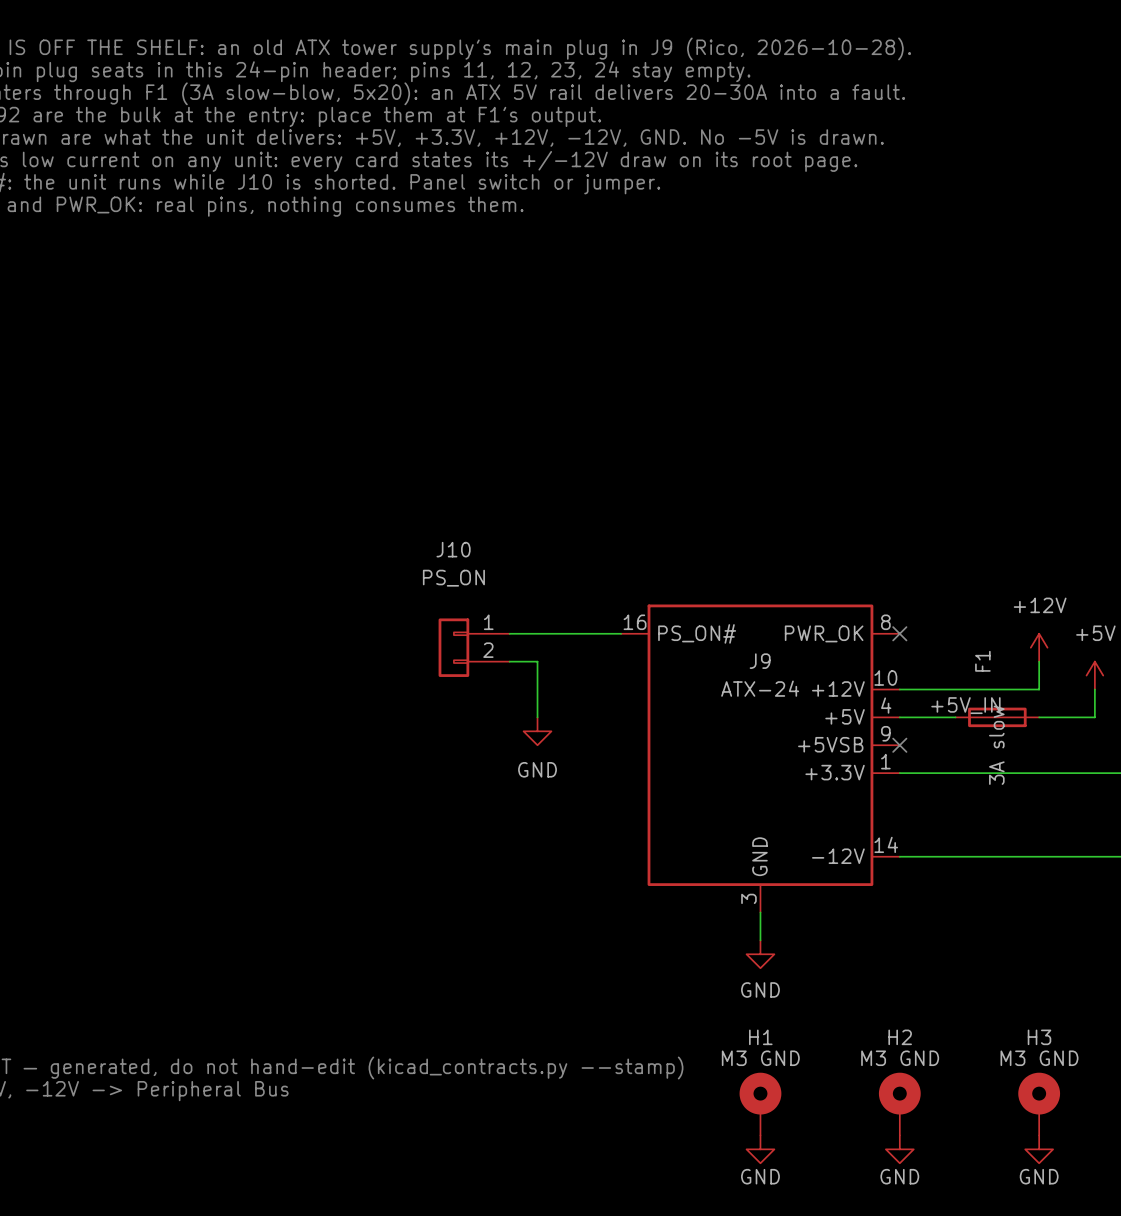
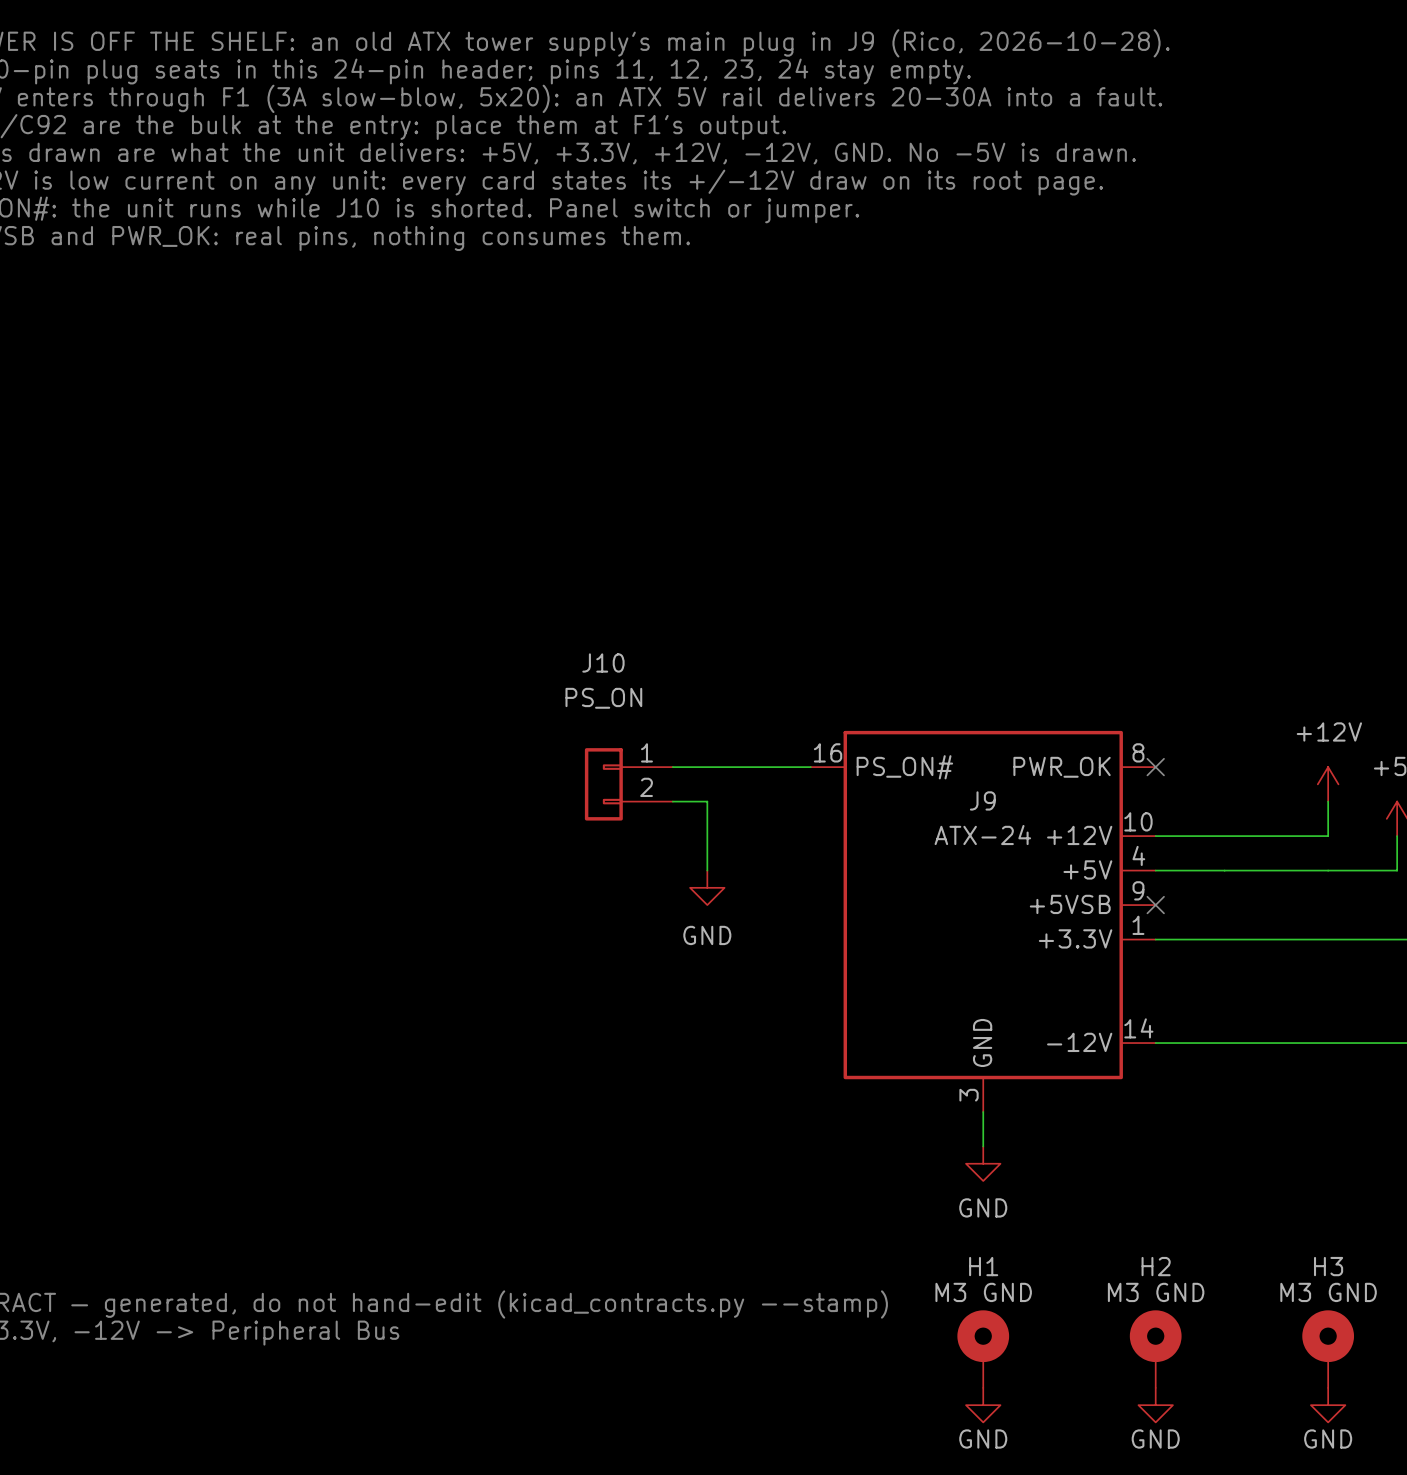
label: +5V_IN (965, 705) -> none
F1: 3A slow (997, 717) -> none

